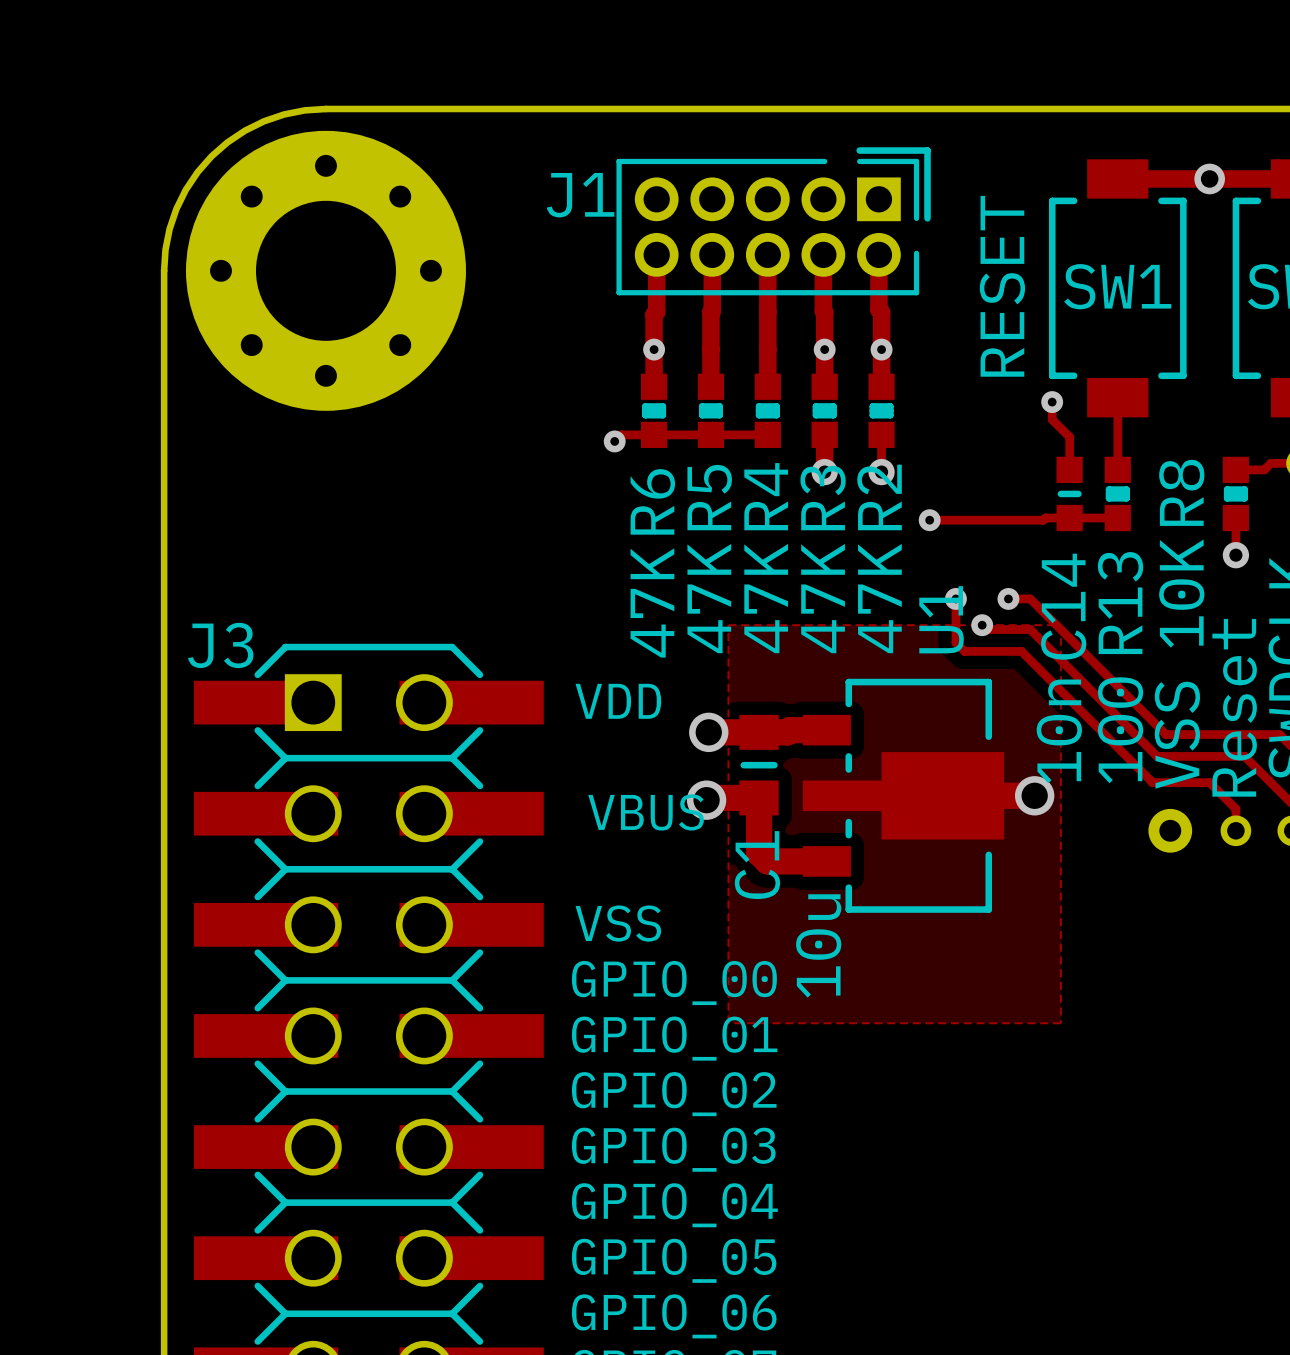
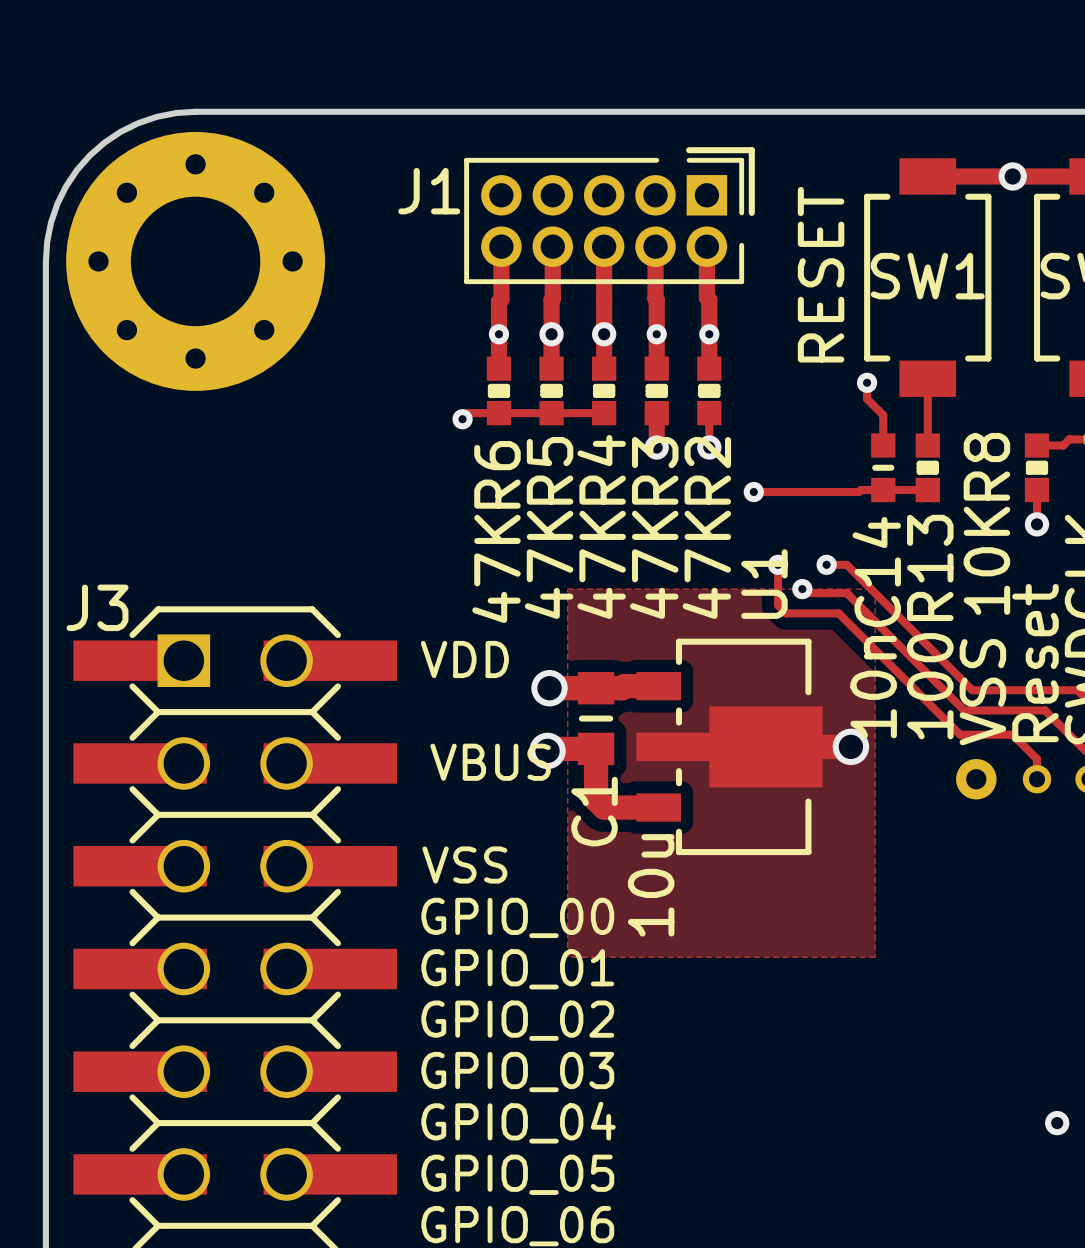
via: none -> (551, 334)
via: none -> (604, 334)
via: none -> (1057, 1123)

